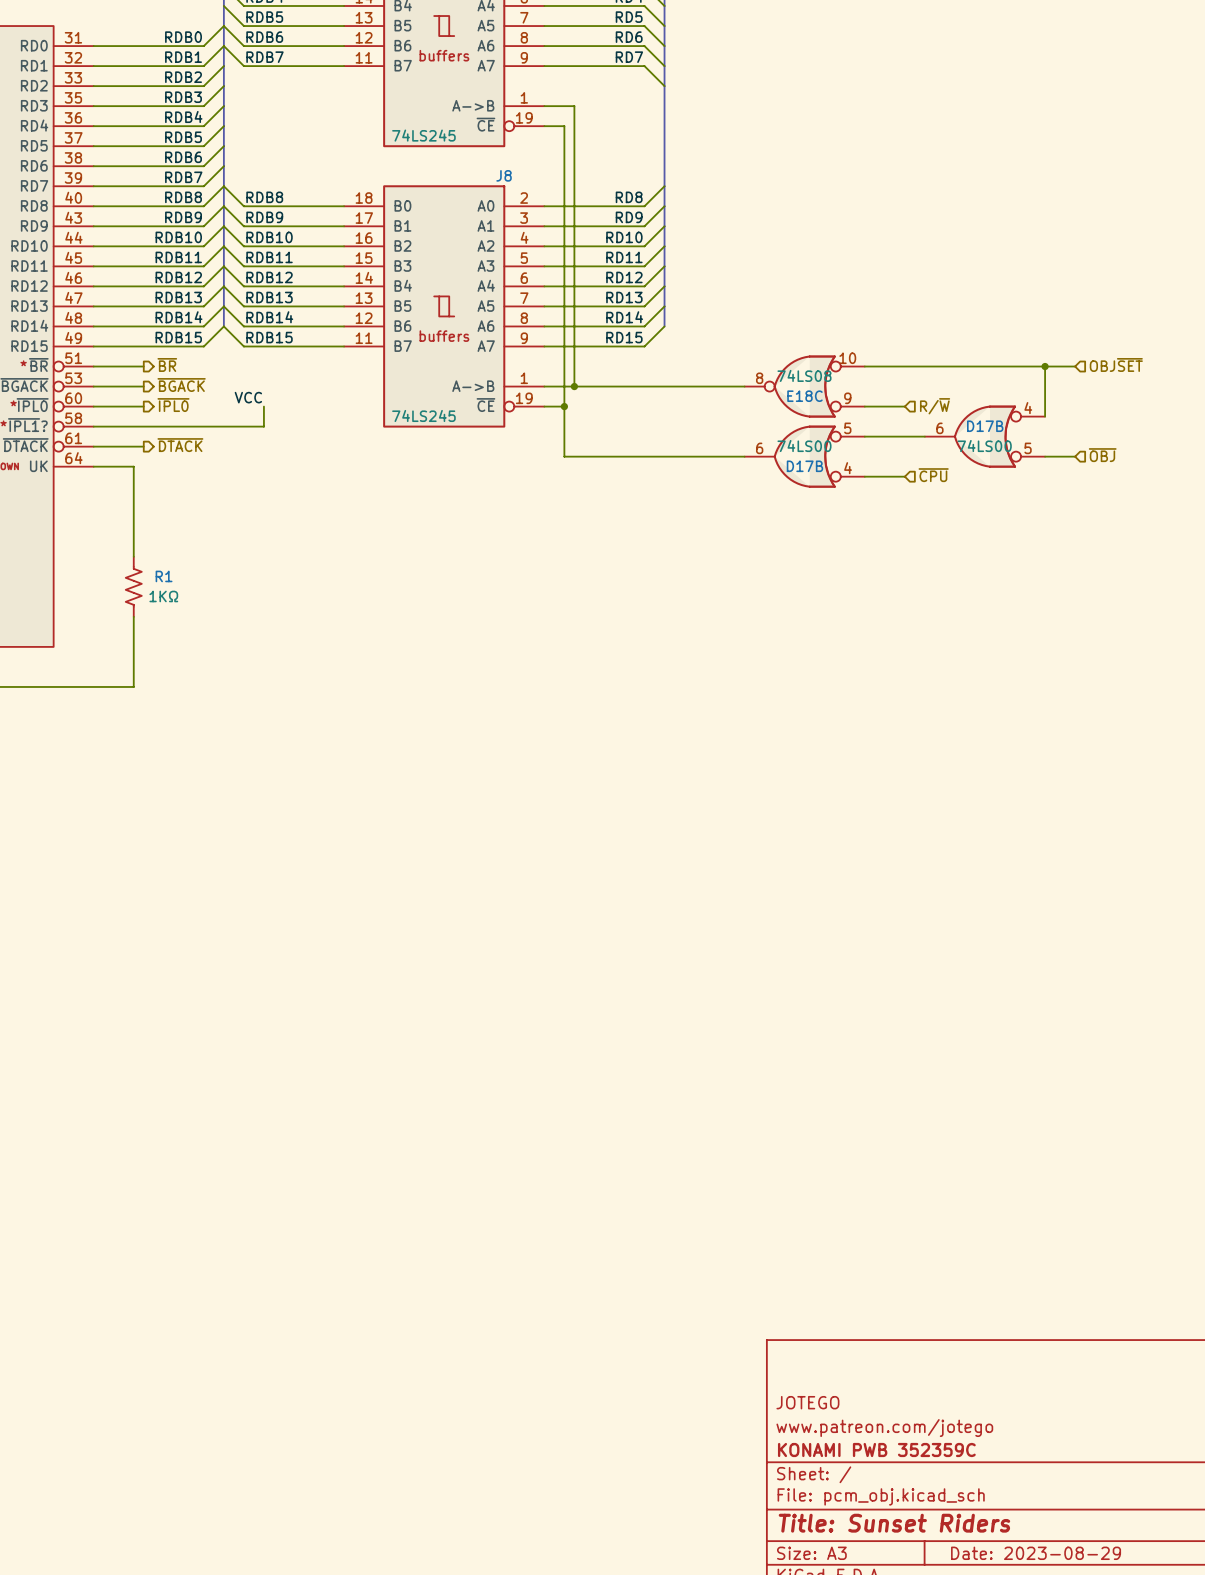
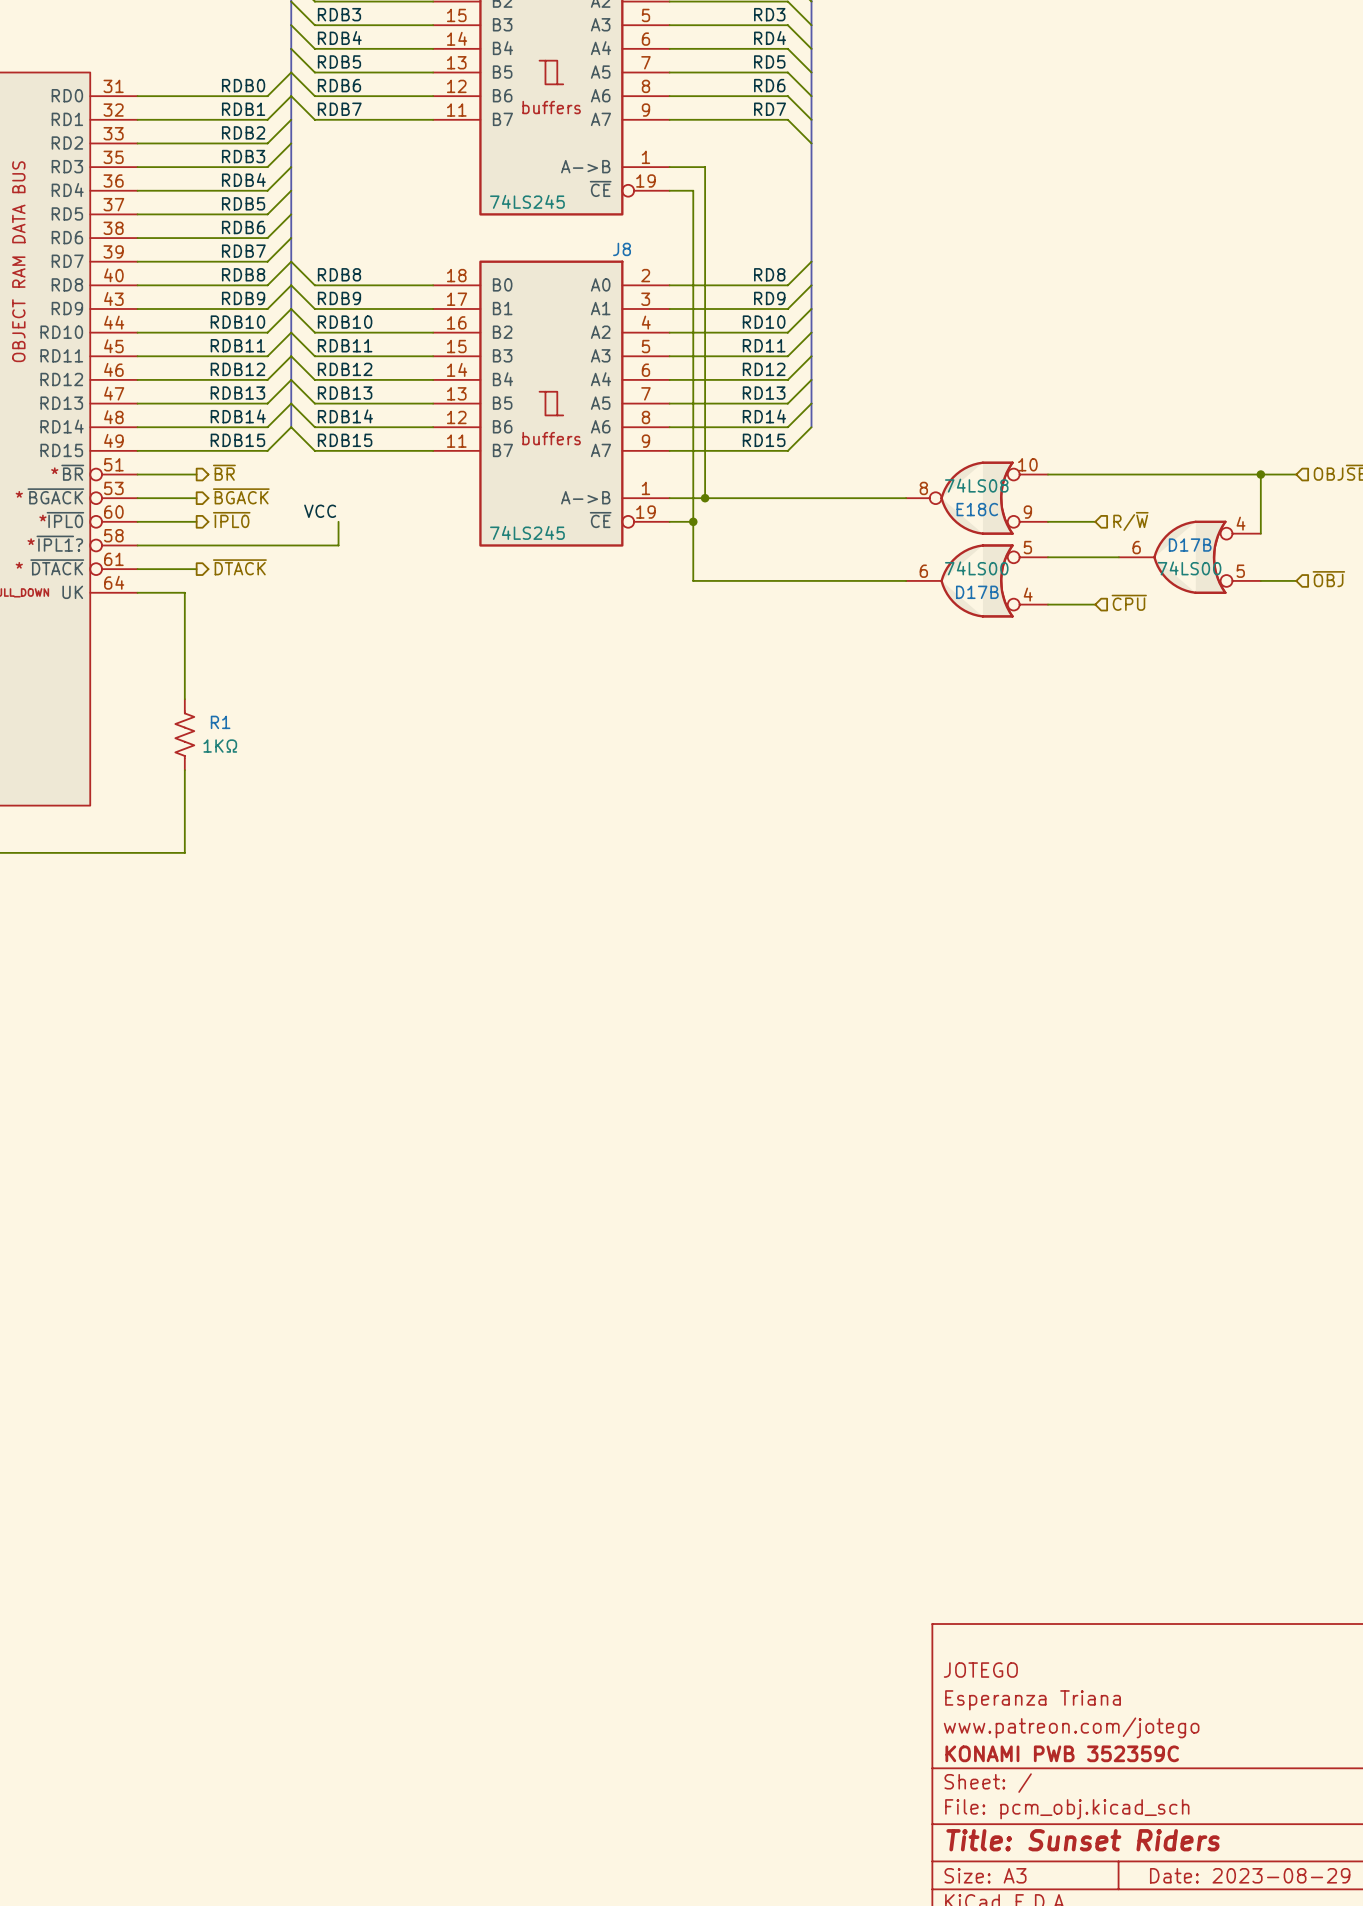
title block: none -> JOTEGO (980, 1670)
title block: JOTEGO (807, 1402) -> Esperanza Triana (1033, 1700)

